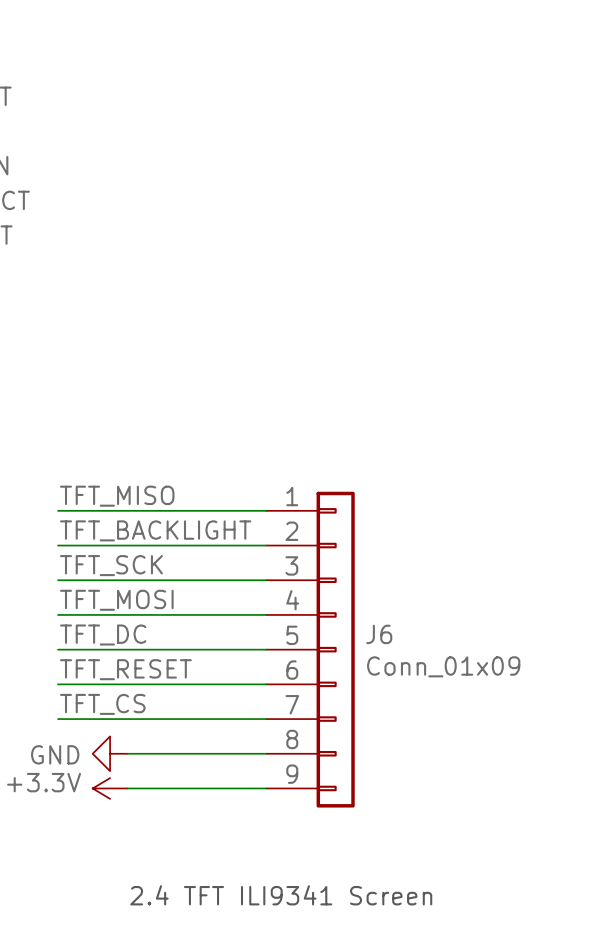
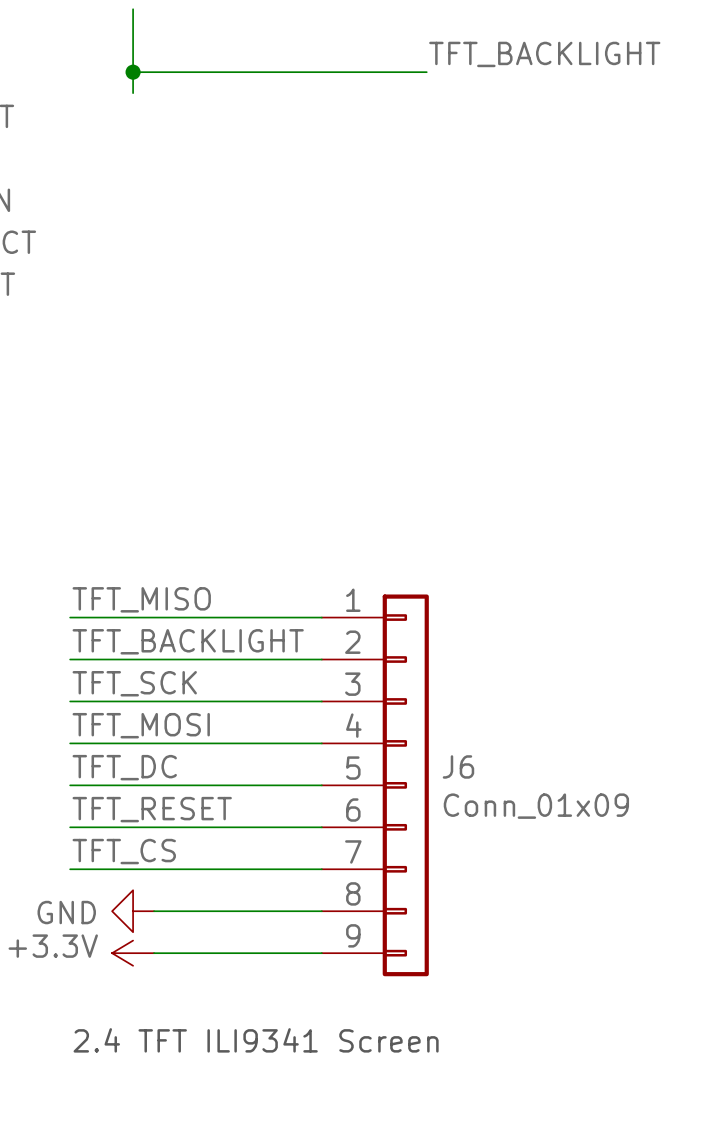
wire: none -> (133, 9) (133, 93)
label: none -> TFT_BACKLIGHT (544, 54)
wire: none -> (133, 72) (426, 72)
junction: none -> (133, 72)
text position: 2.4 TFT ILI9341 Screen (281, 895) -> 2.4 TFT ILI9341 Screen (256, 1040)

